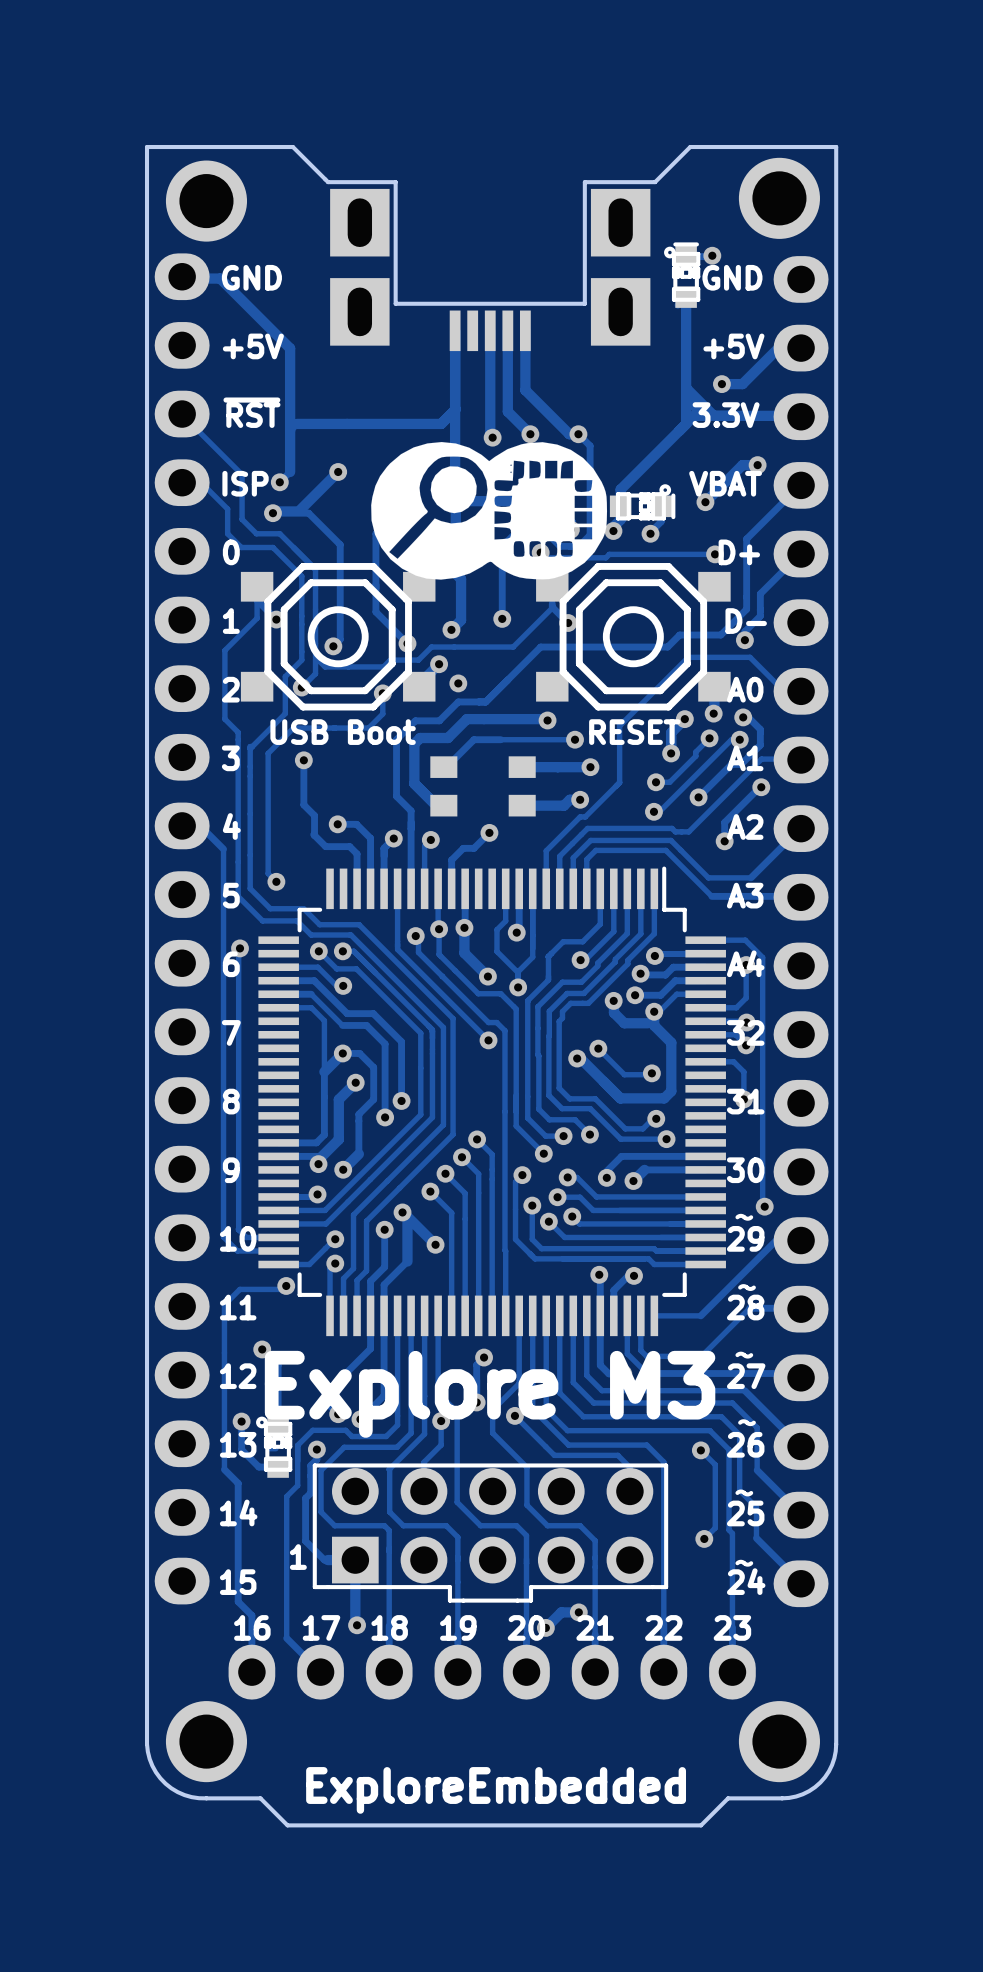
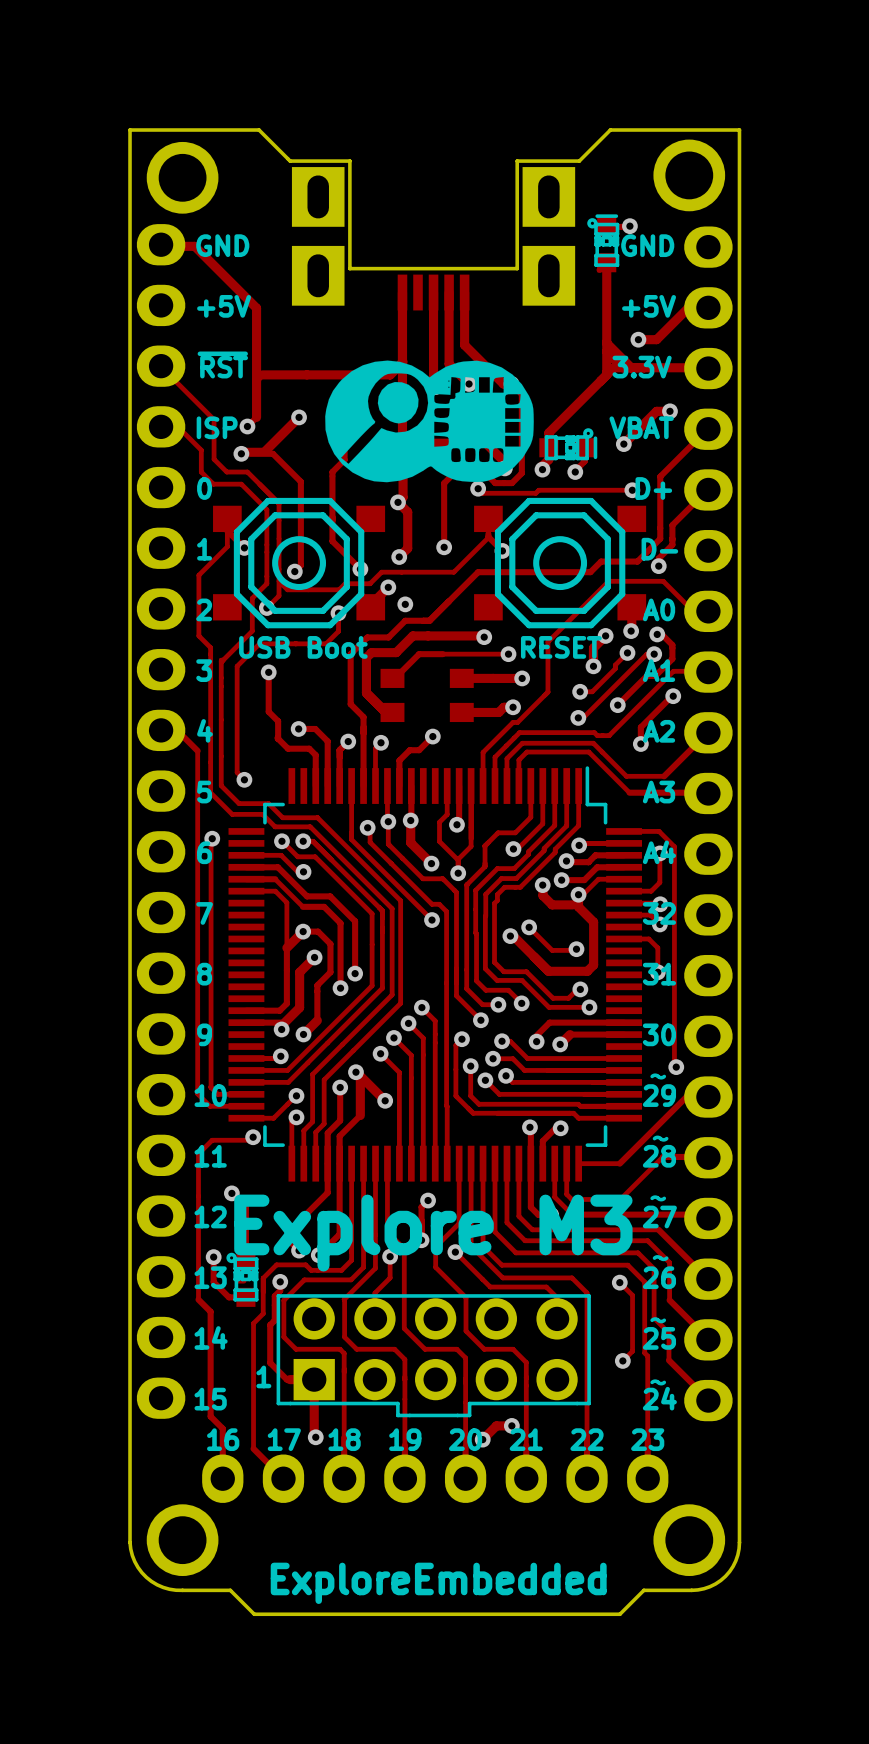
drawing position: (489, 510) -> (429, 421)

